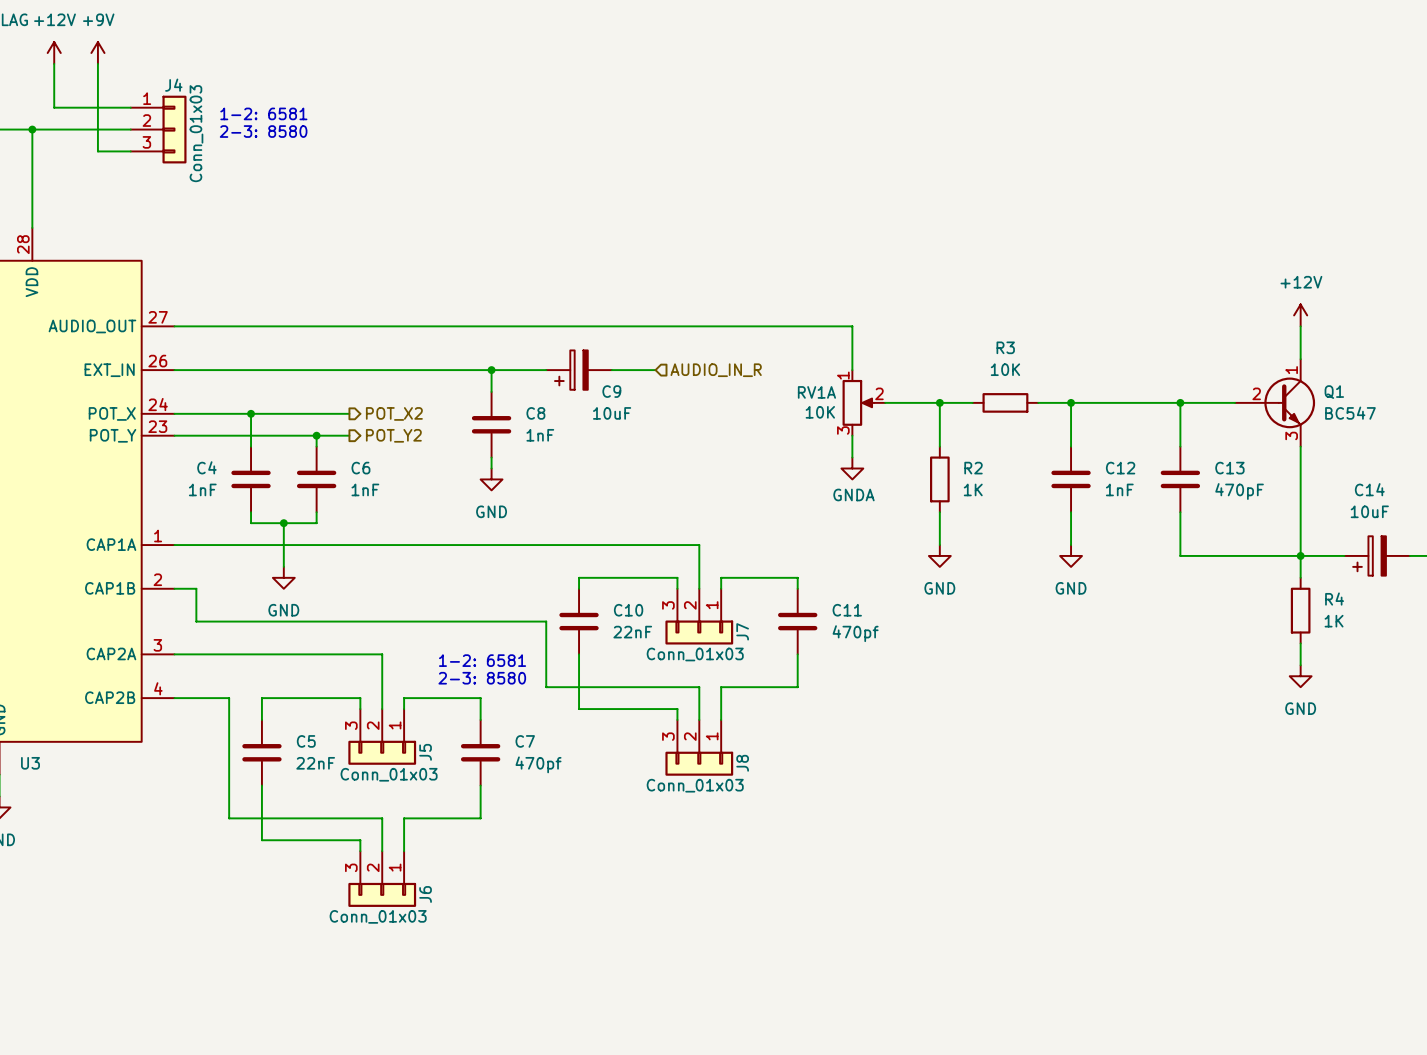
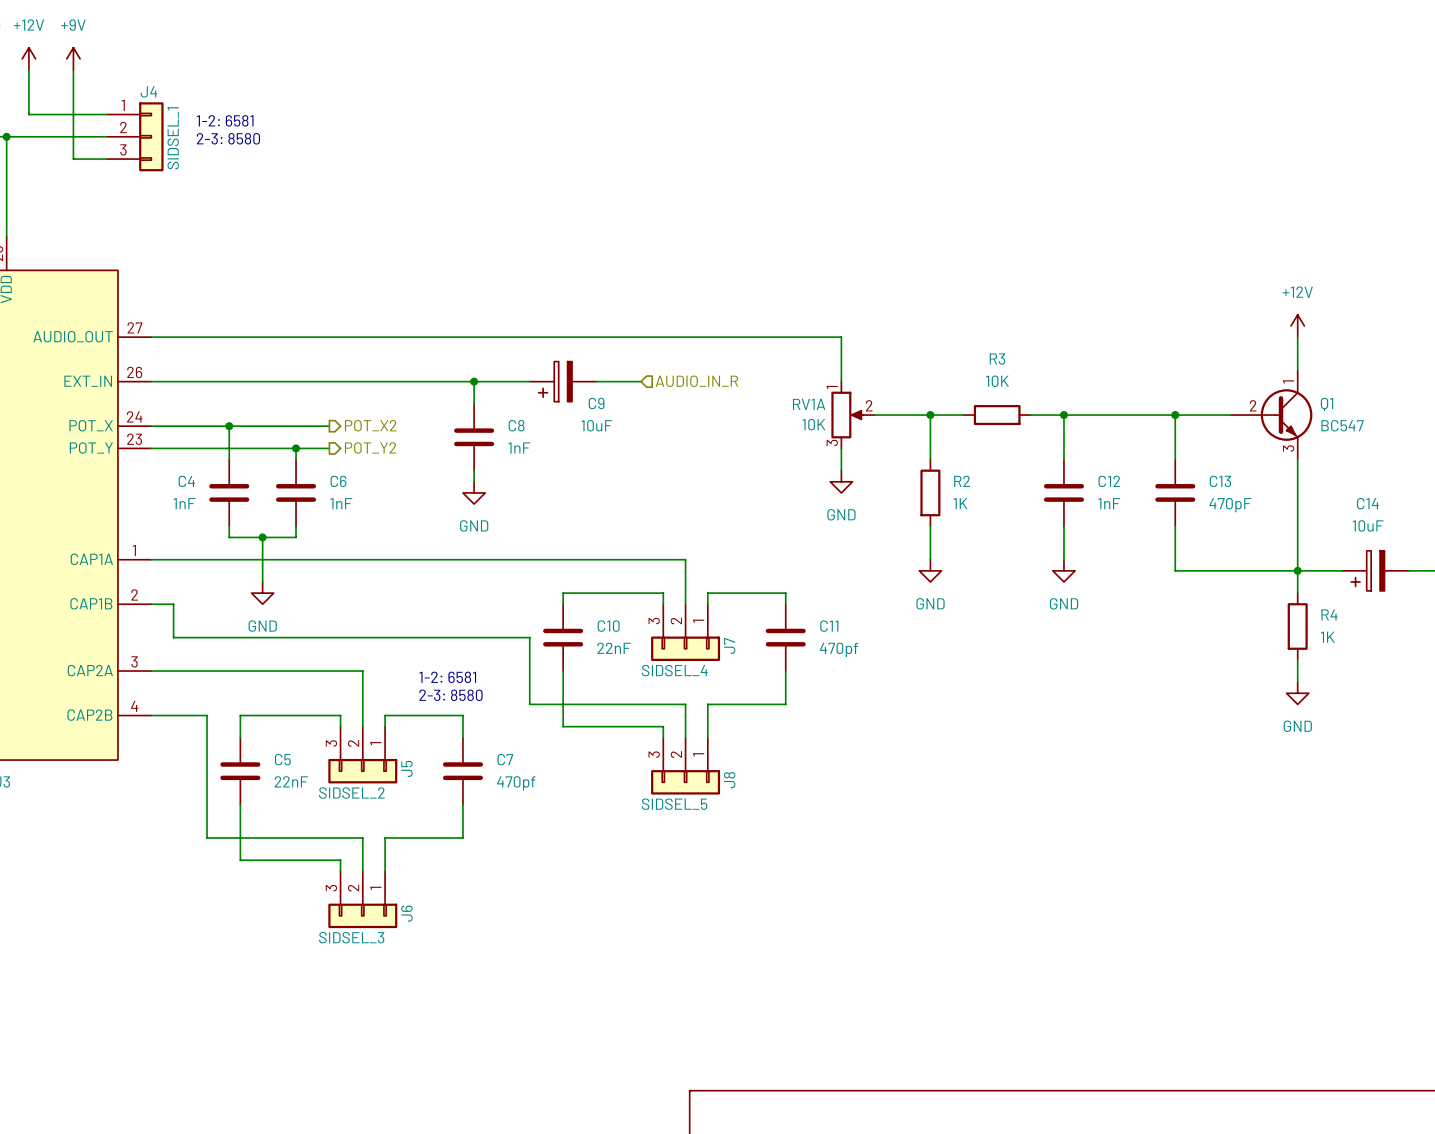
J4 value: Conn_01x03 (196, 133) -> SIDSEL_1 (173, 138)
power symbol: GNDA (852, 468) -> GND (841, 481)
J7 value: Conn_01x03 (695, 654) -> SIDSEL_4 (674, 670)
J5 value: Conn_01x03 (389, 774) -> SIDSEL_2 (351, 793)
J8 value: Conn_01x03 (695, 785) -> SIDSEL_5 (674, 804)
J6 value: Conn_01x03 (378, 916) -> SIDSEL_3 (351, 937)

